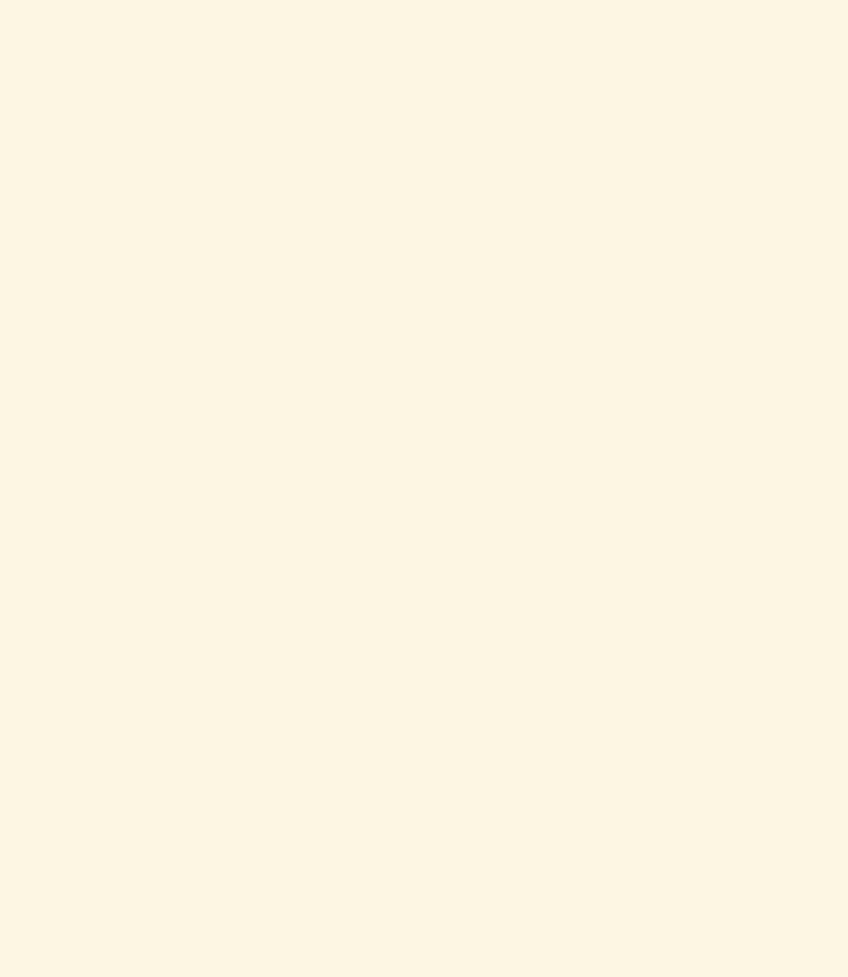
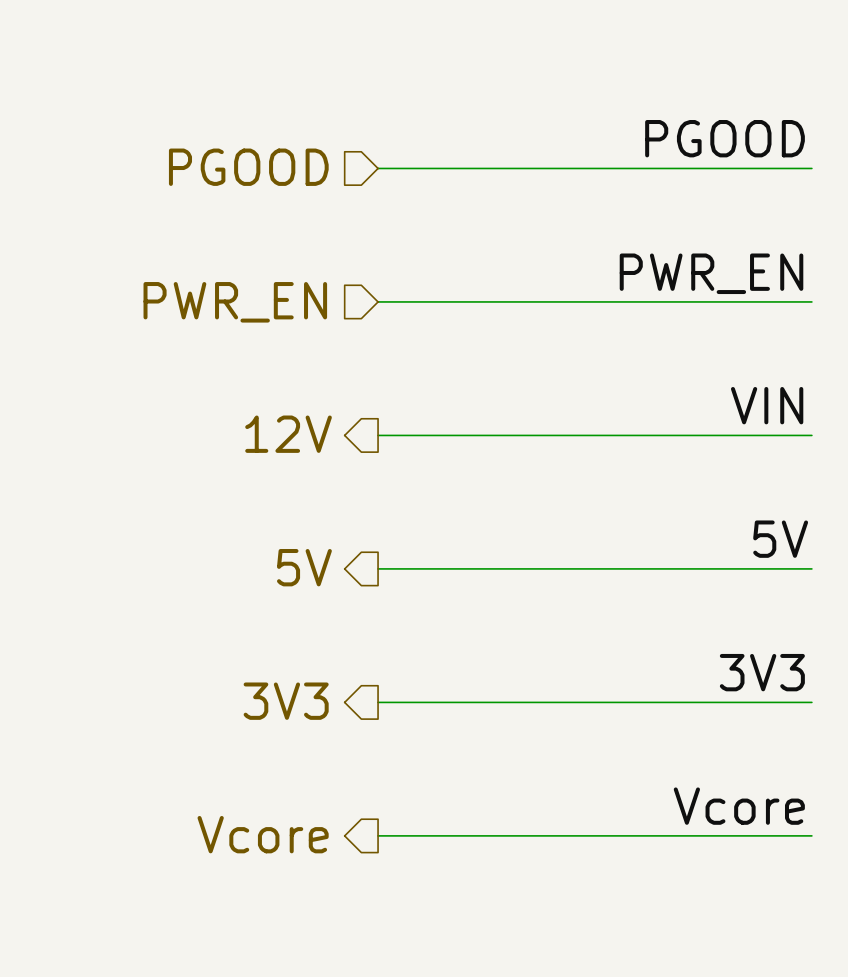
label: none -> PGOOD (725, 138)
hierarchical label: none -> PGOOD (248, 167)
wire: none -> (378, 168) (811, 168)
label: none -> PWR_EN (711, 273)
wire: none -> (378, 301) (811, 301)
hierarchical label: none -> PWR_EN (235, 302)
label: none -> VIN (767, 405)
hierarchical label: none -> 12V (288, 434)
wire: none -> (378, 435) (811, 435)
label: none -> 5V (780, 539)
hierarchical label: none -> 5V (304, 567)
wire: none -> (378, 568) (811, 568)
label: none -> 3V3 (762, 672)
hierarchical label: none -> 3V3 (286, 701)
wire: none -> (378, 702) (811, 702)
label: none -> Vcore (739, 806)
hierarchical label: none -> Vcore (263, 834)
wire: none -> (378, 835) (811, 835)

